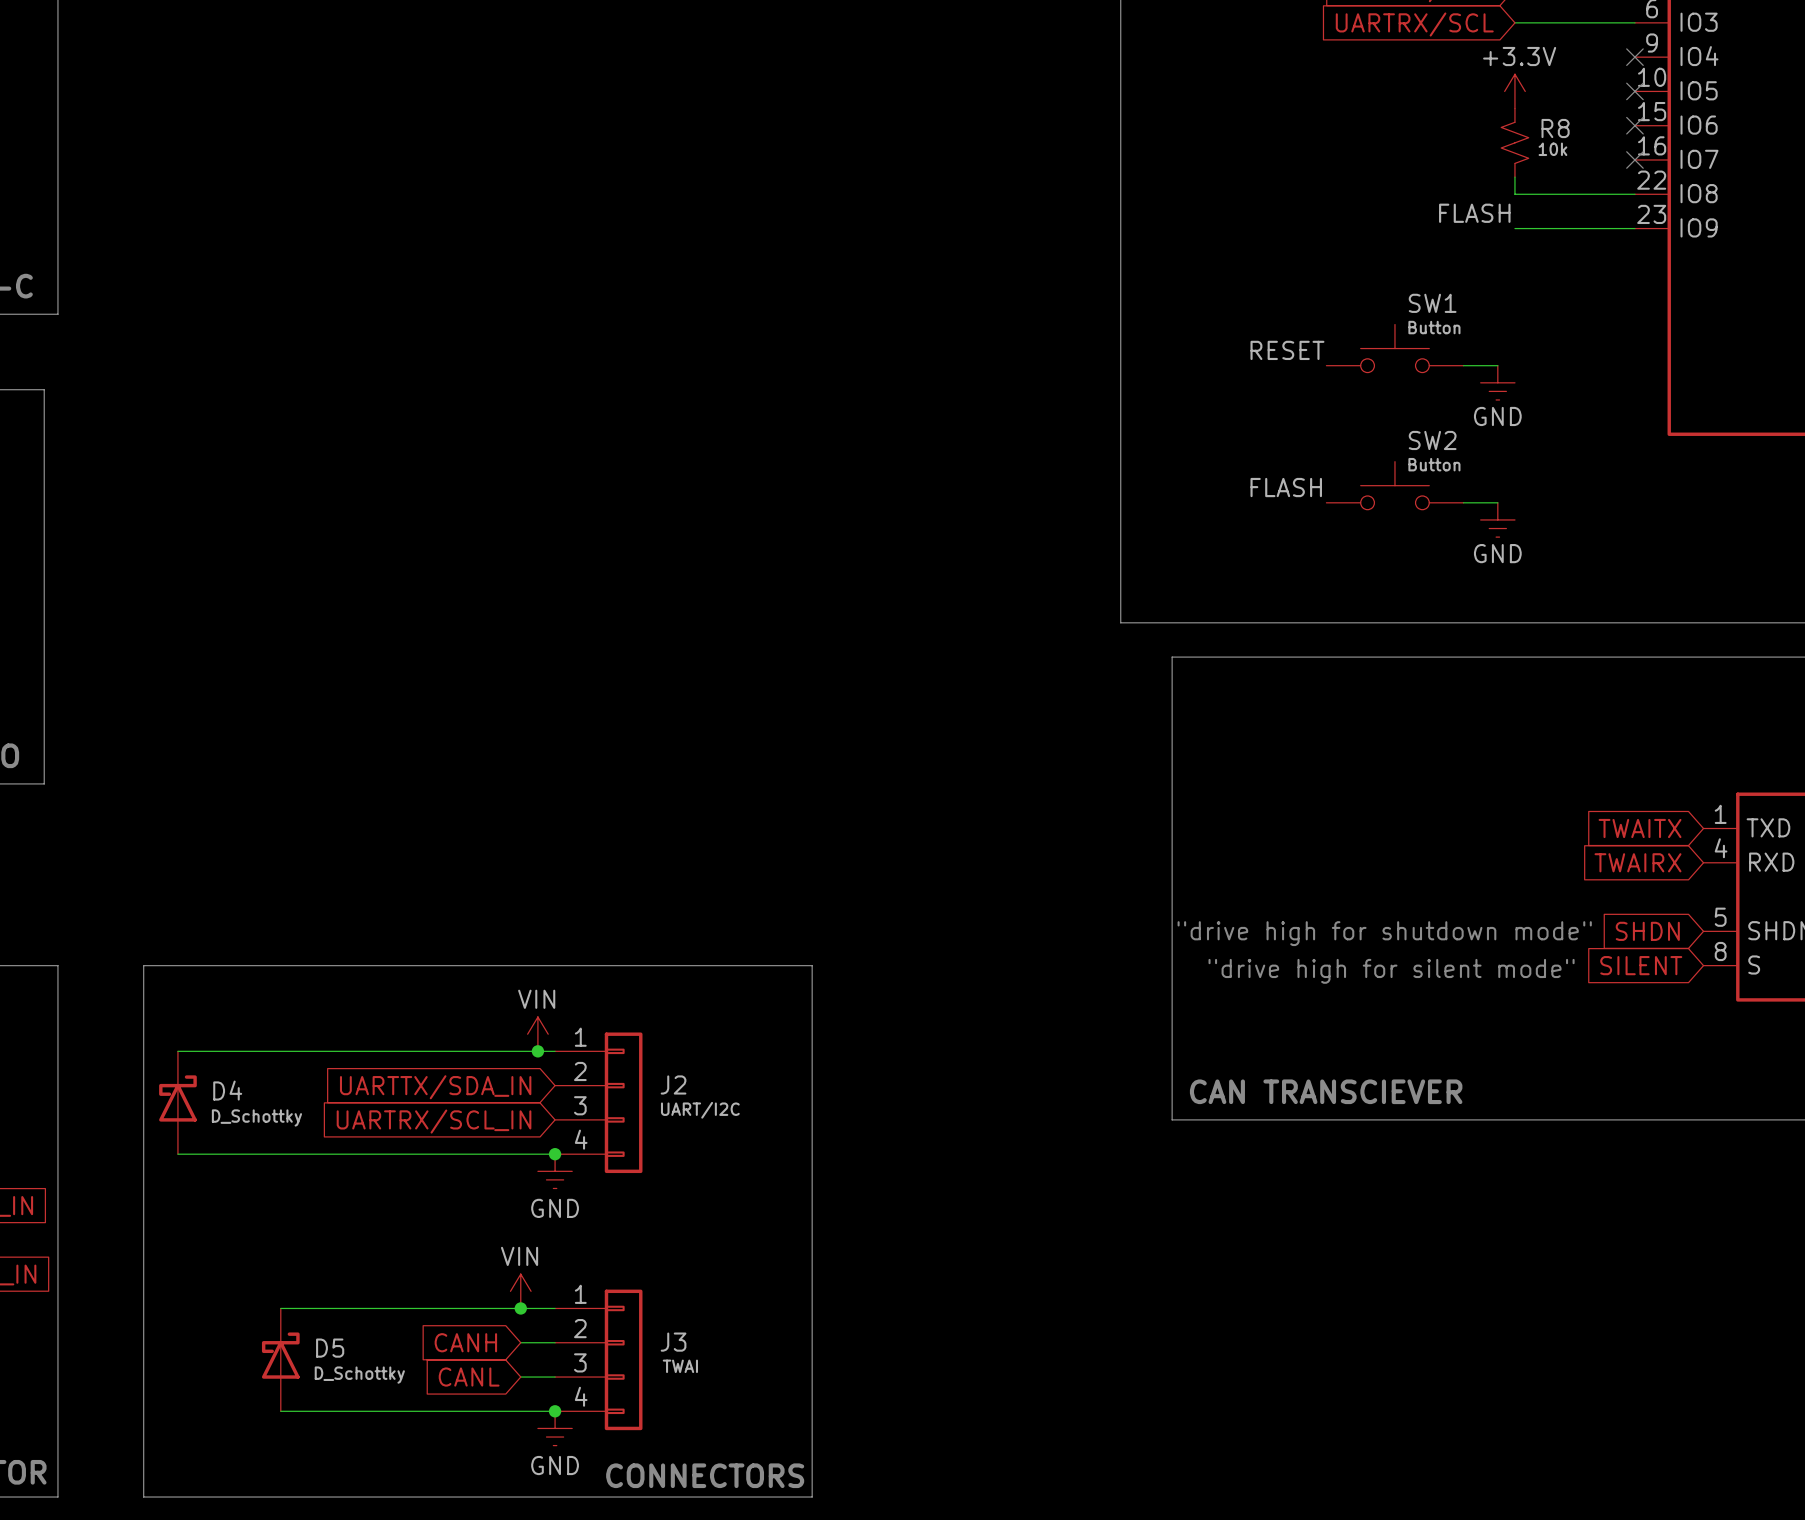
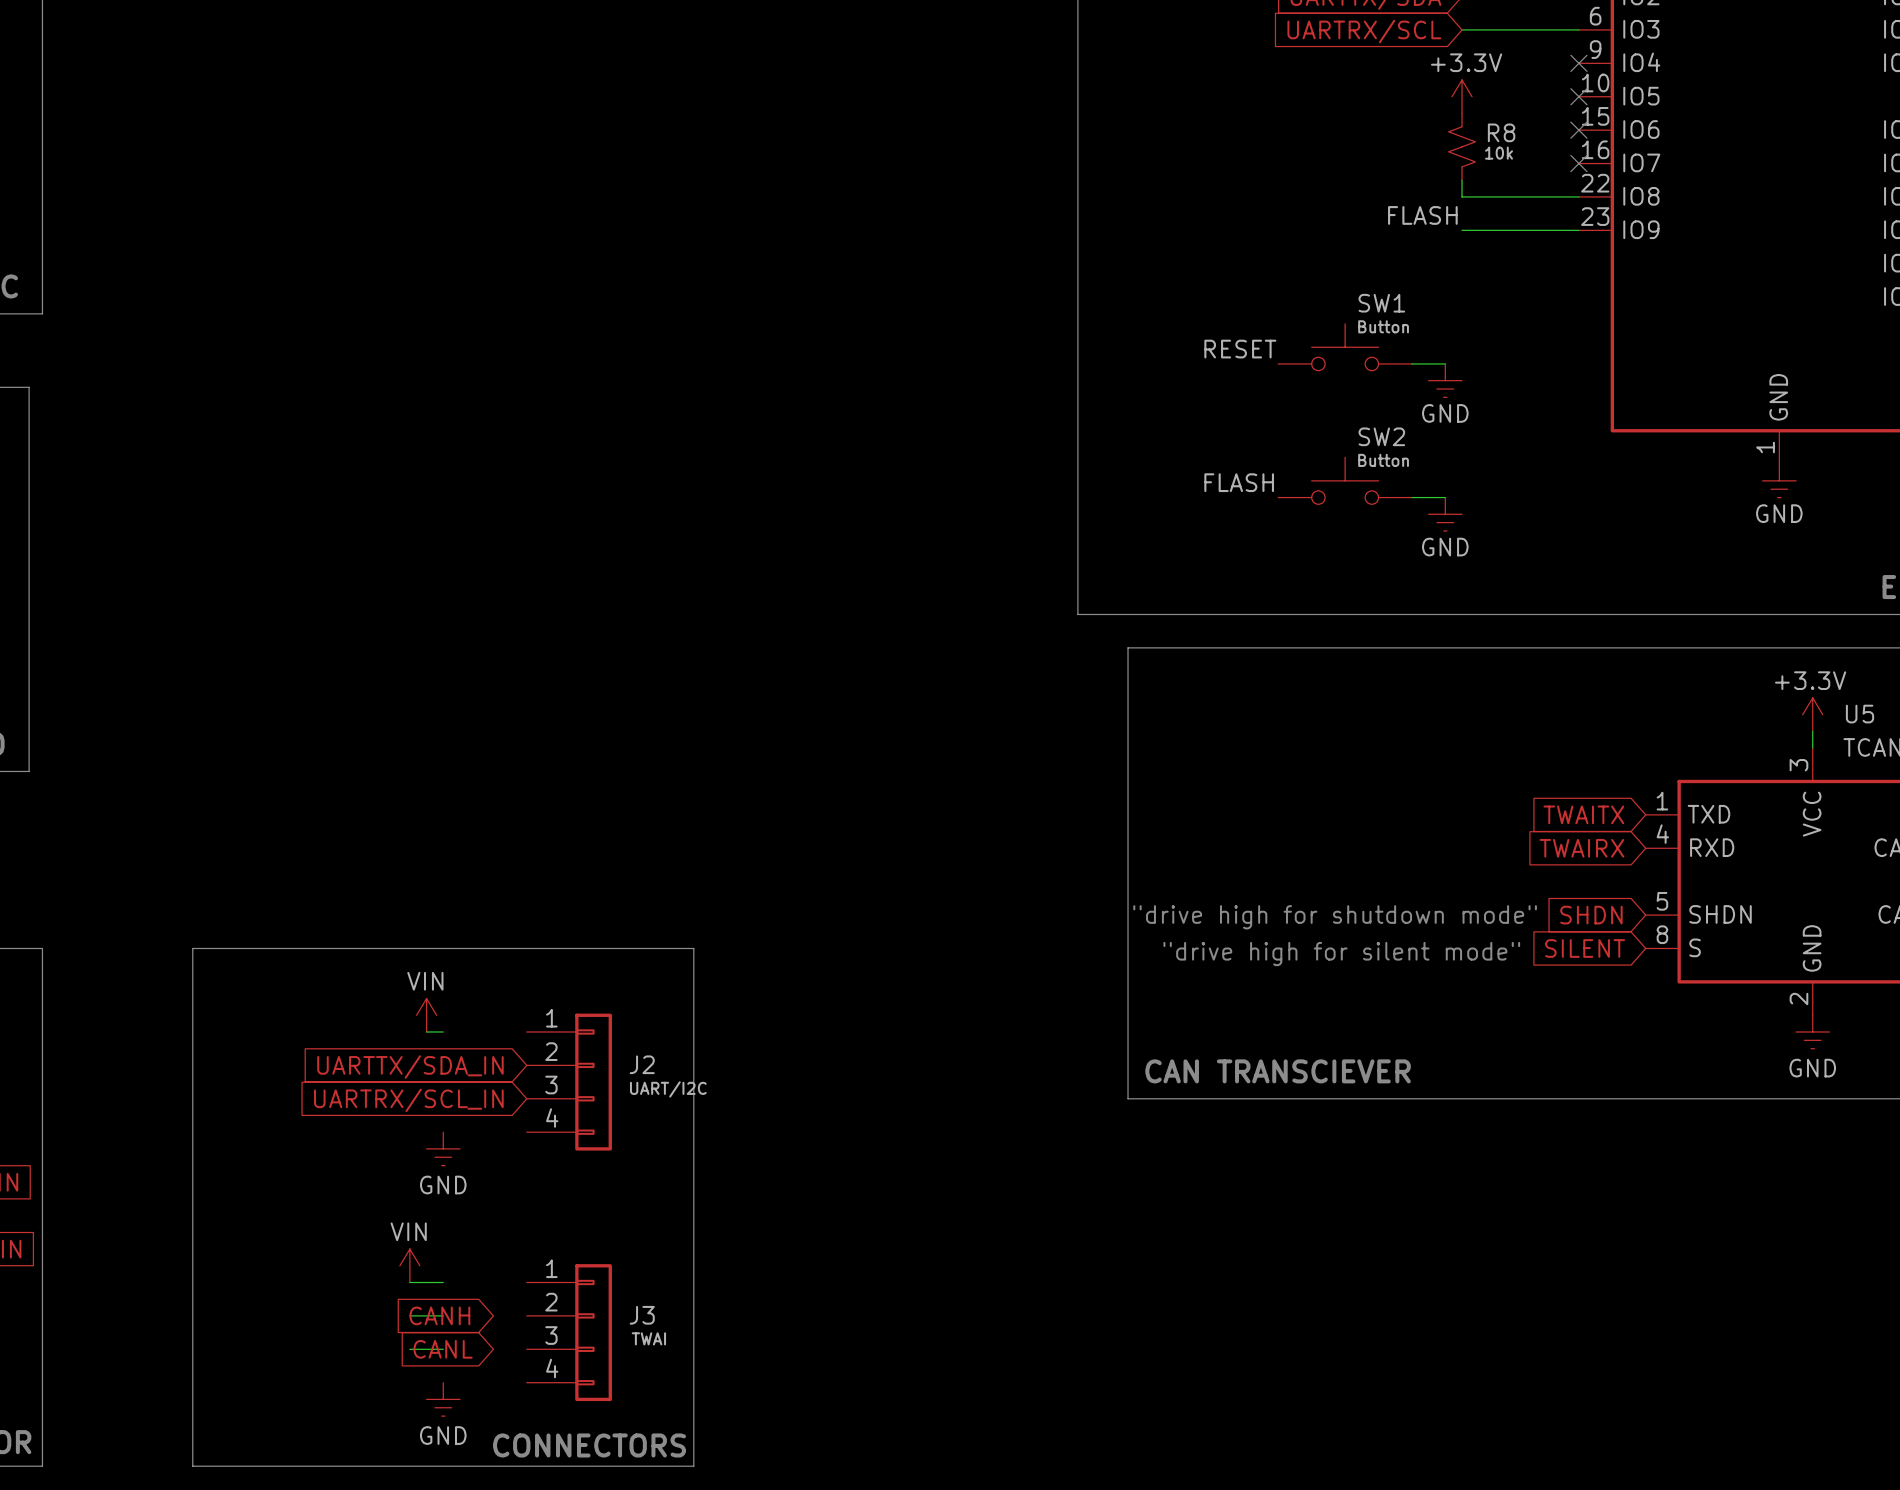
line: (212, 965) (143, 965) (143, 1497) (212, 1497) -> (192, 948) (192, 1466)
line: (726, 965) (812, 965) (812, 1497) (726, 1497) -> (693, 948) (693, 1466)
power symbol position: VIN (537, 1034) -> VIN (426, 1015)
wire: (177, 1051) (452, 1051) -> none
wire: (469, 1051) (555, 1051) -> none
junction: (537, 1051) -> none
D4: D_Schottky (177, 1102) -> none
wire: (177, 1154) (555, 1154) -> none
junction: (555, 1154) -> none
power symbol position: GND (555, 1171) -> GND (443, 1148)
power symbol position: VIN (520, 1291) -> VIN (409, 1265)
wire: (280, 1308) (435, 1308) -> none
wire: (469, 1308) (555, 1308) -> none
junction: (520, 1308) -> none
wire: (520, 1342) (555, 1342) -> (409, 1315) (443, 1315)
D5: D_Schottky (280, 1359) -> none
wire: (520, 1377) (555, 1377) -> (409, 1349) (443, 1349)
wire: (280, 1411) (555, 1411) -> none
junction: (555, 1411) -> none
power symbol position: GND (555, 1428) -> GND (443, 1399)
text position: CONNECTORS (705, 1475) -> CONNECTORS (589, 1445)

